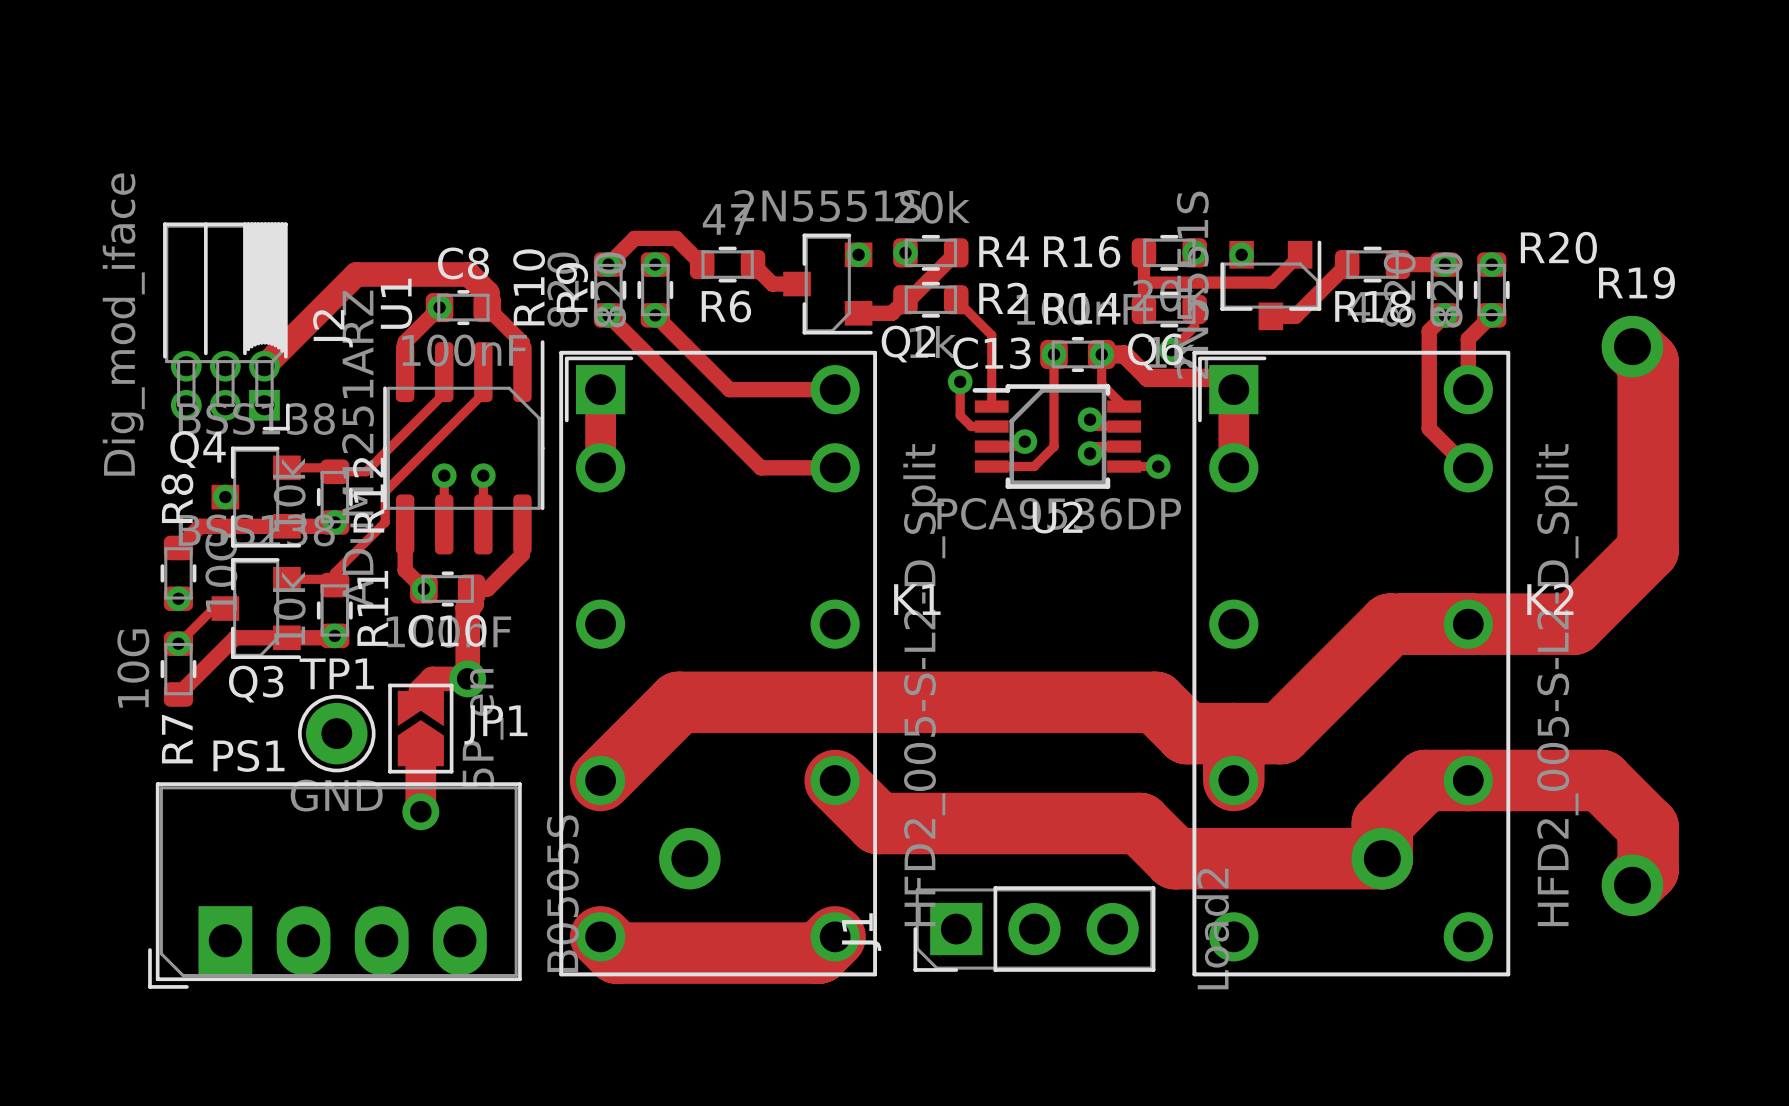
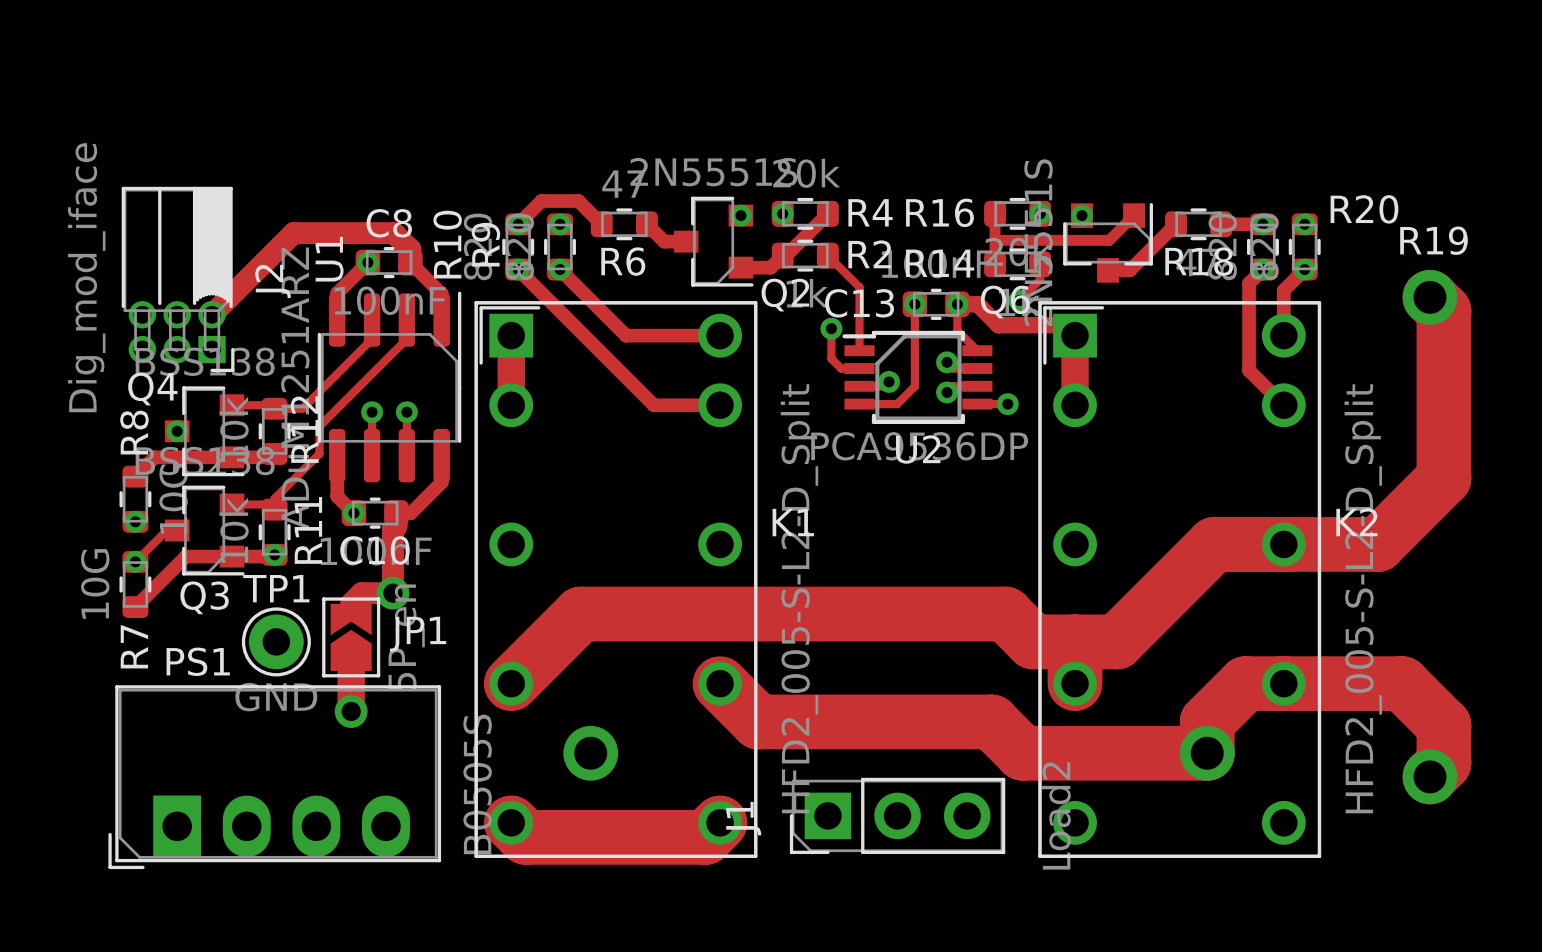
via: (334, 522) -> none

